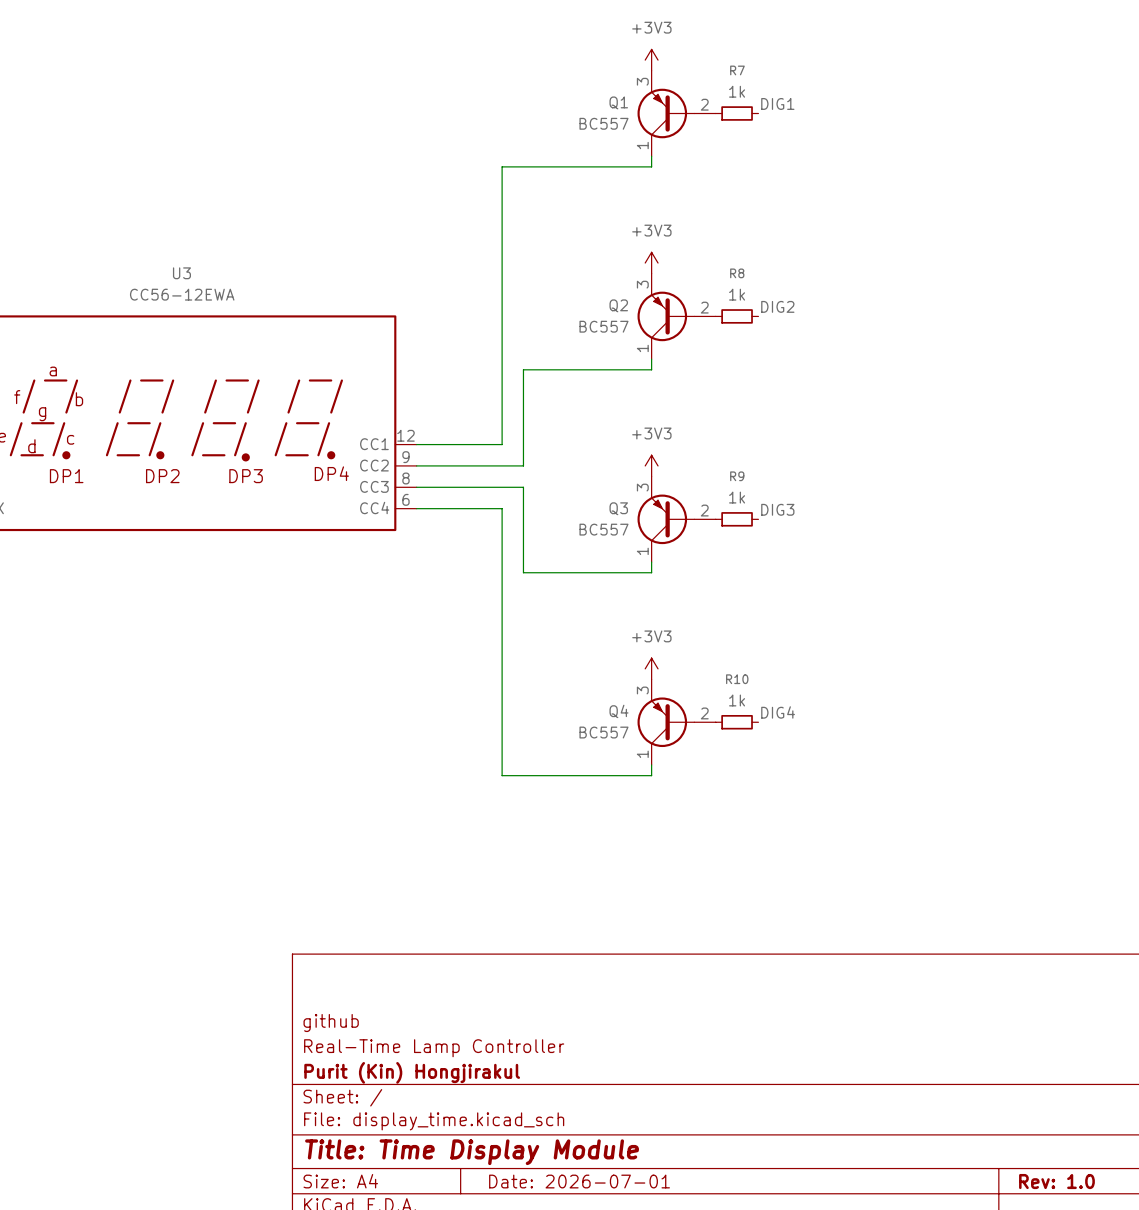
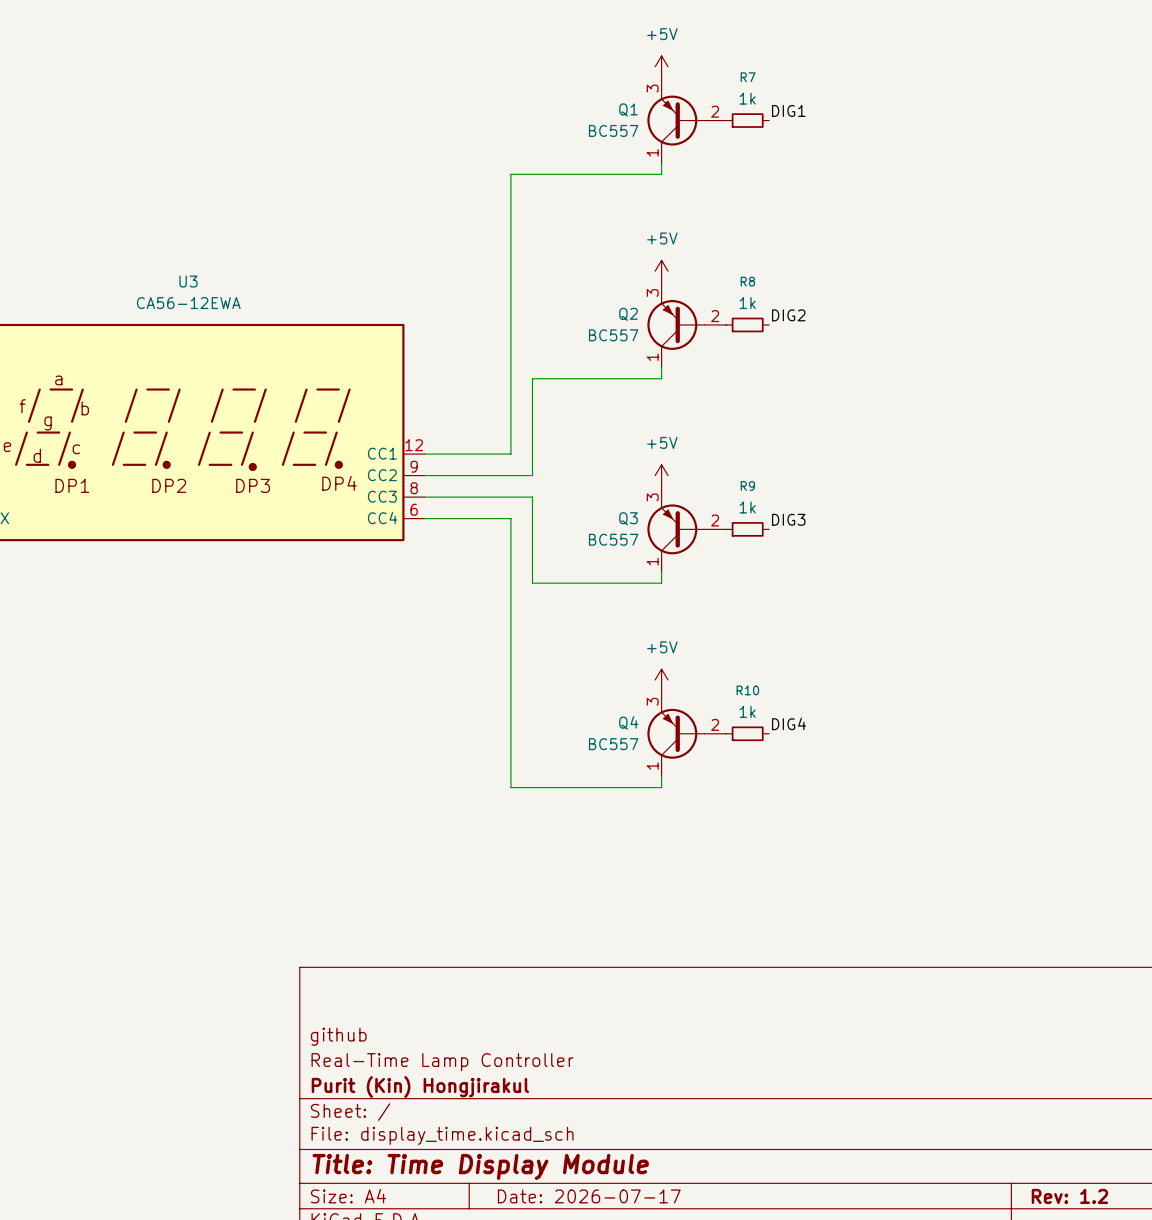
power symbol: +3V3 (651, 60) -> +5V (661, 66)
power symbol: +3V3 (651, 263) -> +5V (661, 271)
U3 value: CC56-12EWA (182, 294) -> CA56-12EWA (188, 303)
power symbol: +3V3 (651, 465) -> +5V (661, 475)
power symbol: +3V3 (651, 668) -> +5V (661, 680)
title block: Date: 2026-07-01 (579, 1181) -> Date: 2026-07-17 (589, 1196)
title block: Rev: 1.0 (1056, 1181) -> Rev: 1.2 (1069, 1196)

